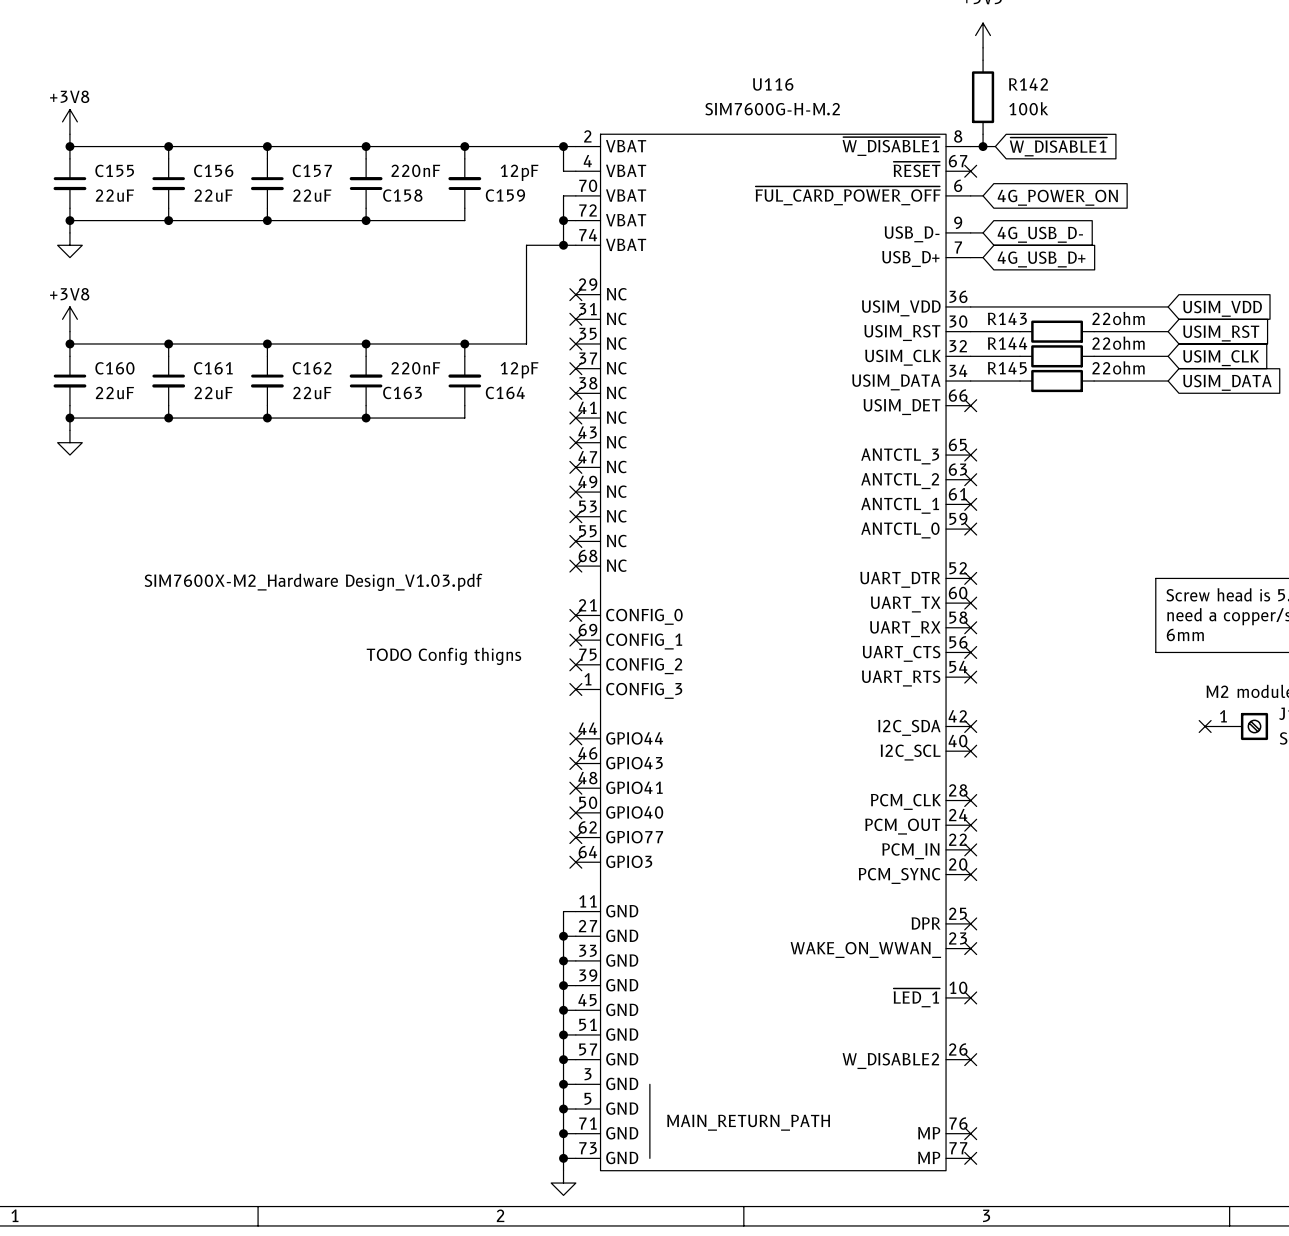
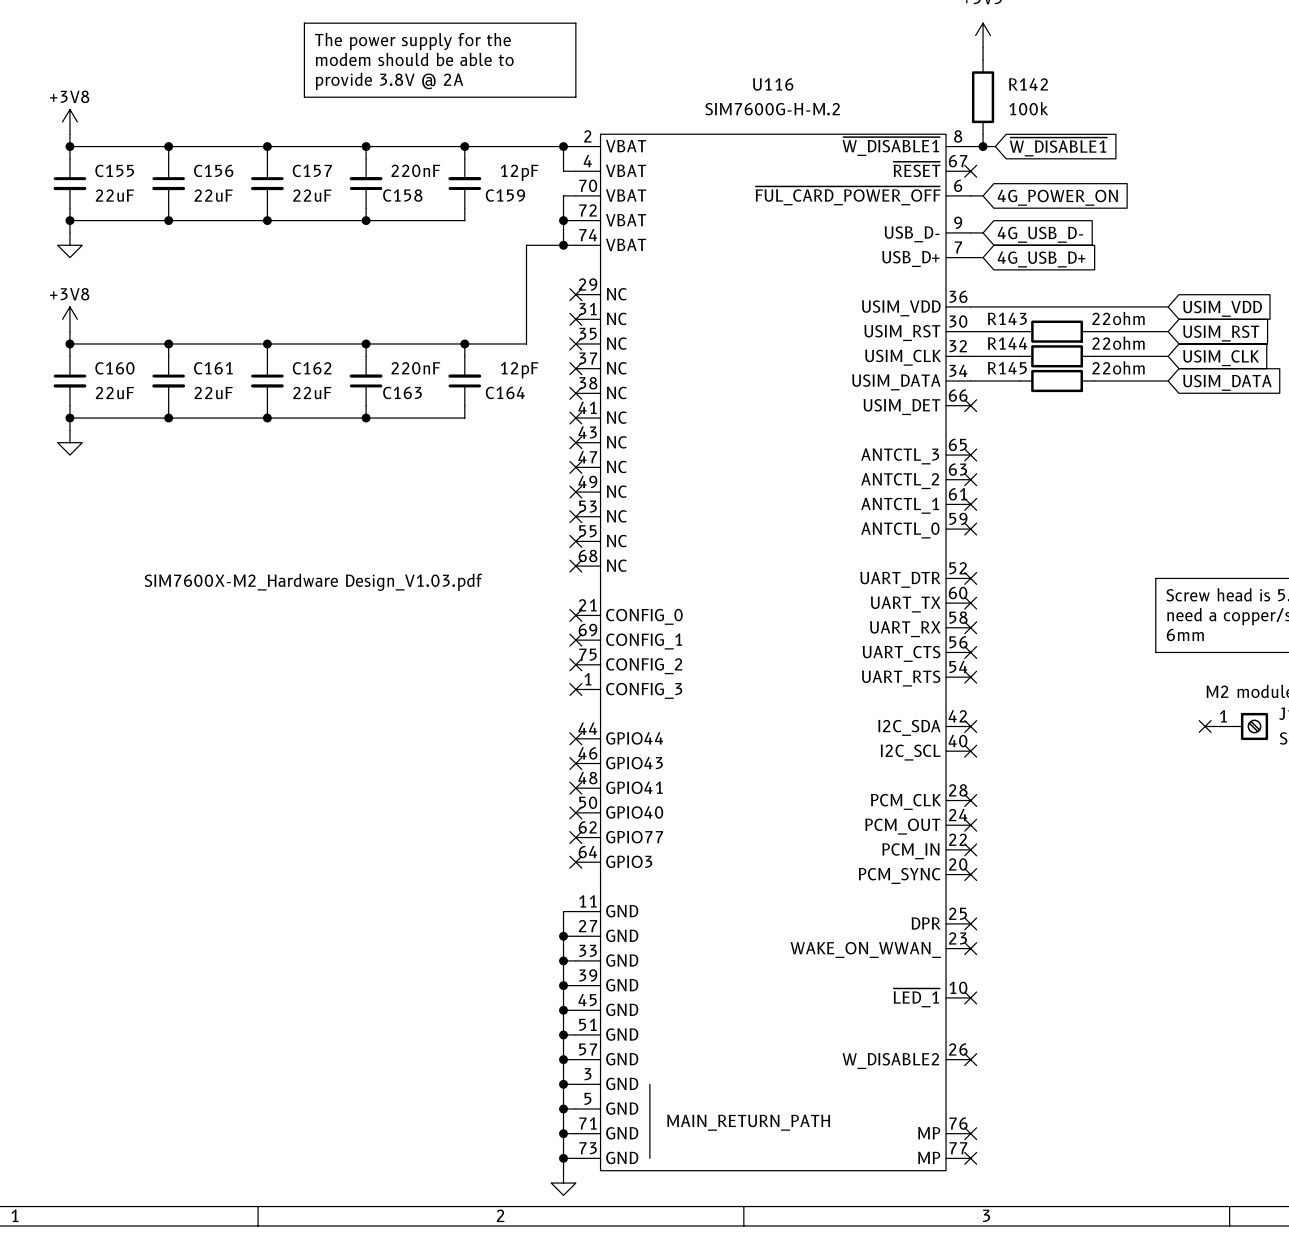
line: none -> (304, 23) (575, 23) (575, 97) (304, 97) (304, 23)
text: none -> The power supply for the (412, 41)
text: none -> modem should be able to (414, 59)
text: none -> provide 3.8V @ 2A (389, 81)
text: TODO Config thigns (443, 656) -> none

